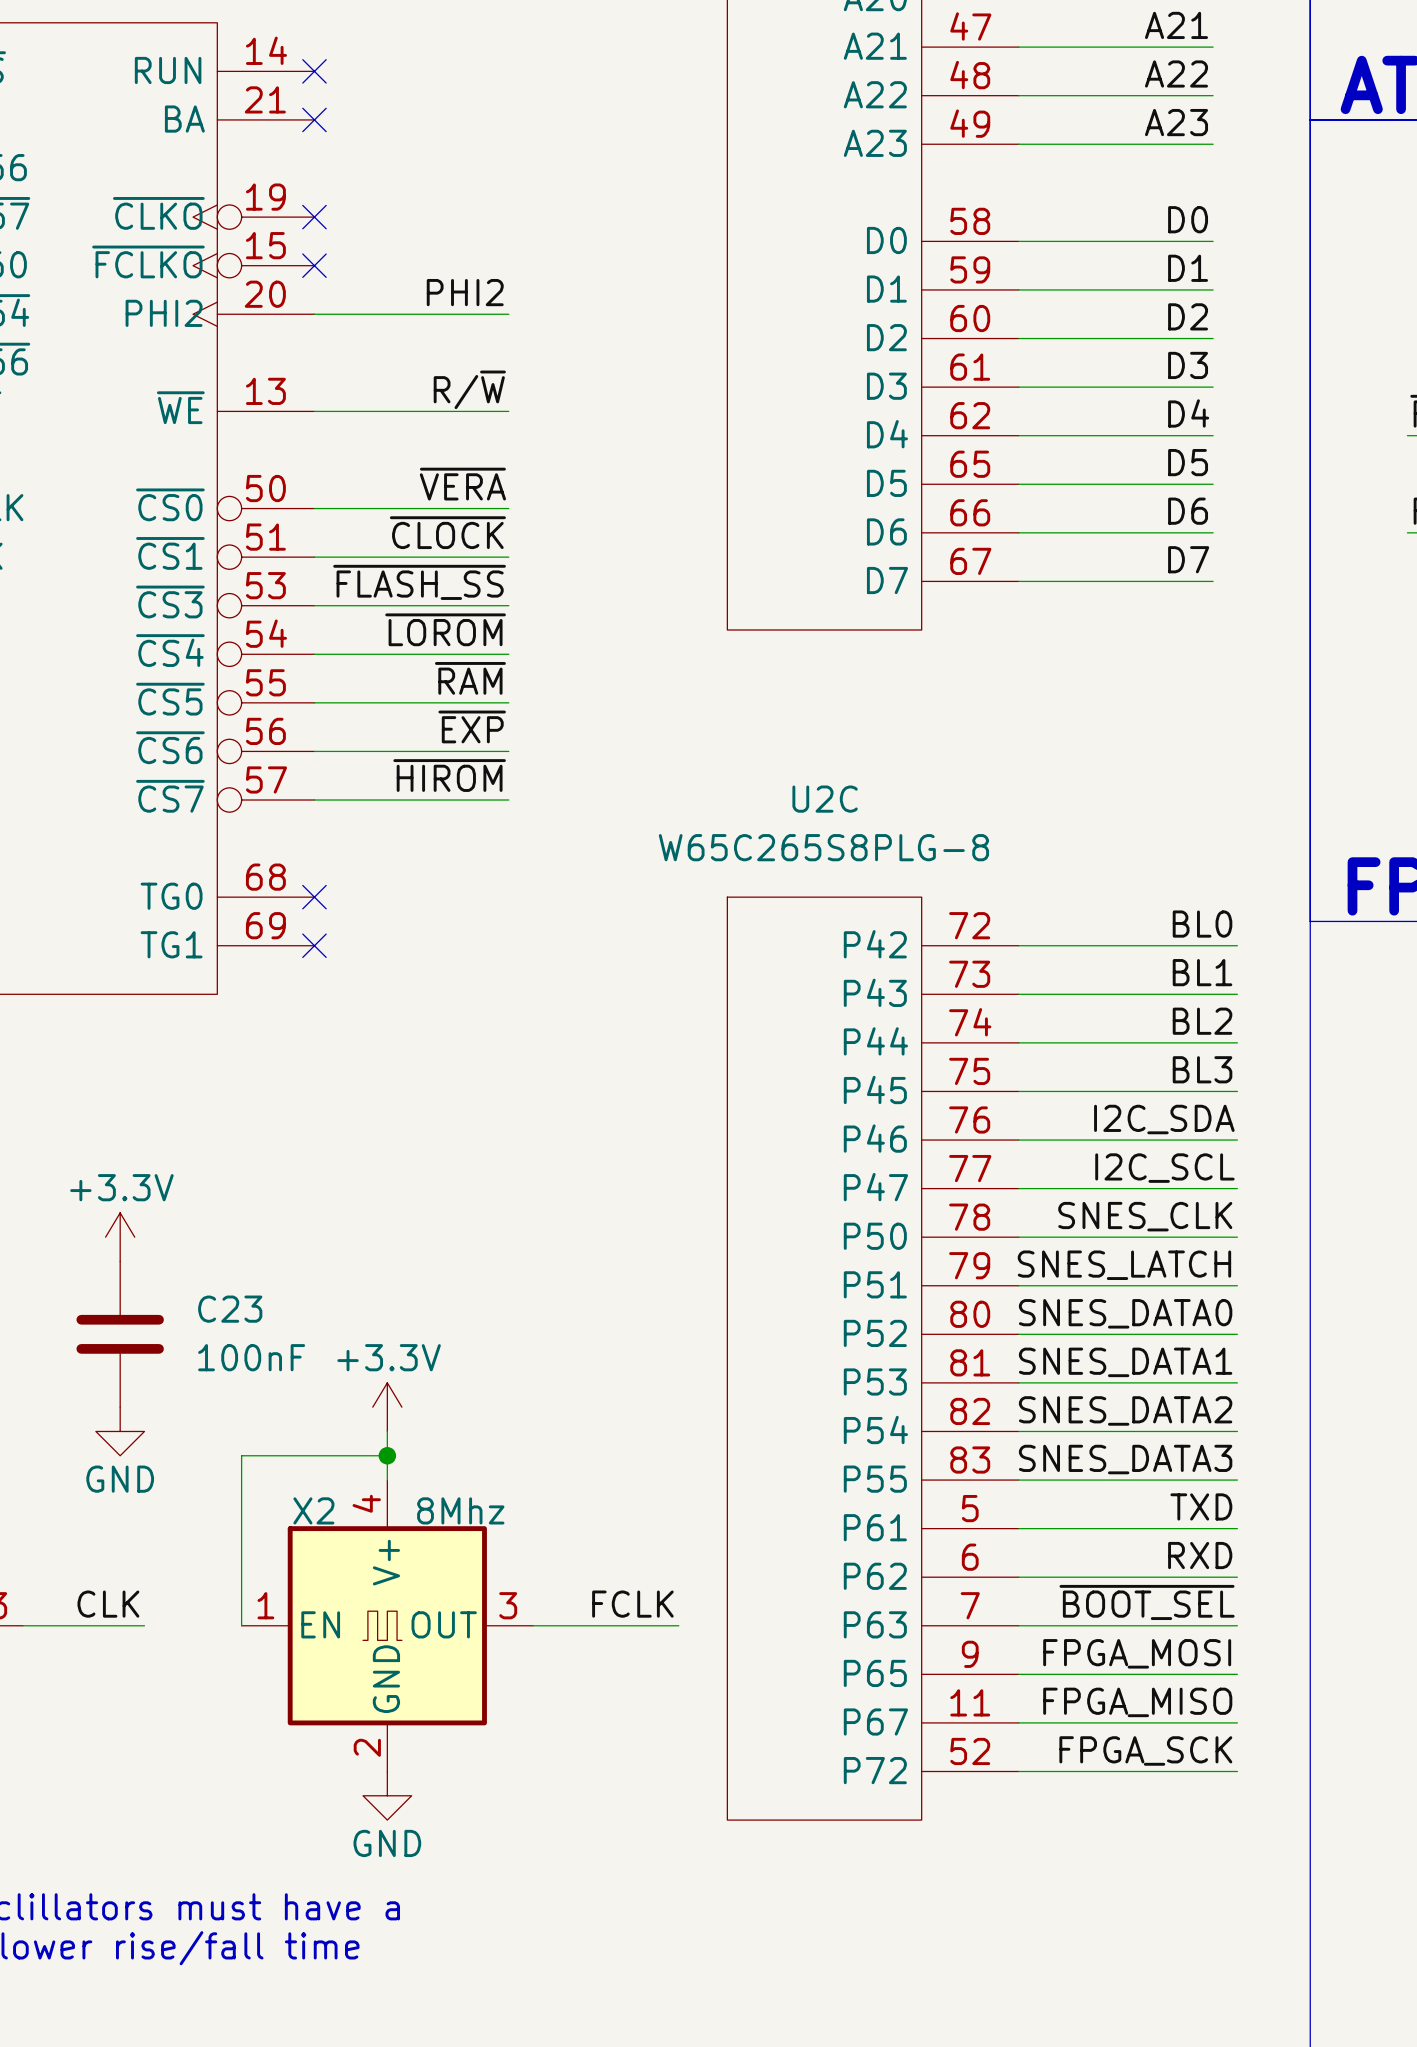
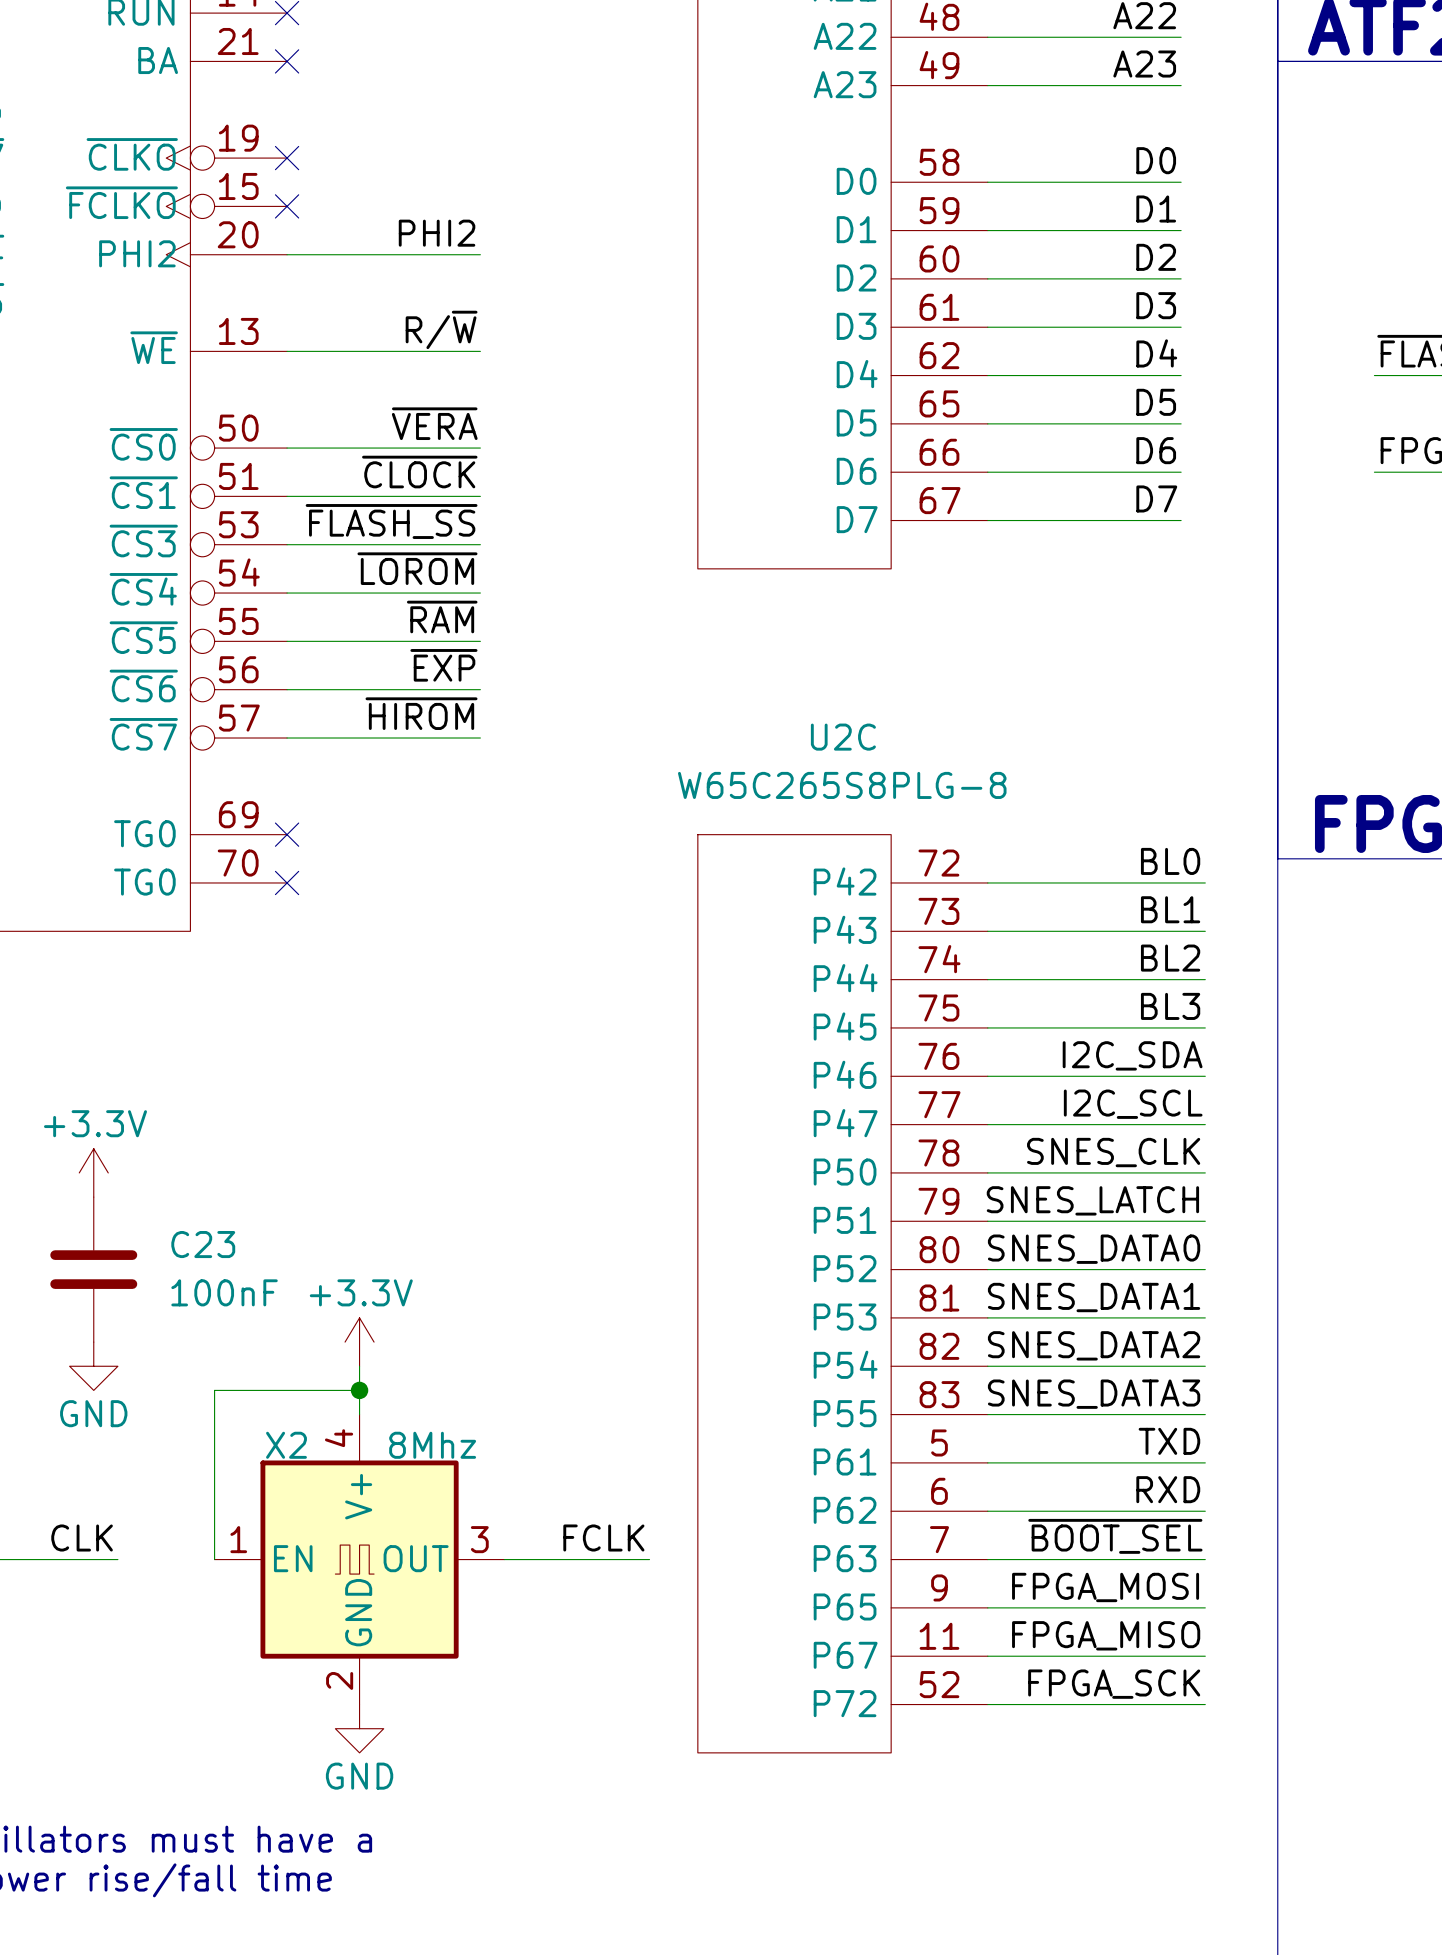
U2C name position: U2C (825, 799) -> U2C (843, 737)
U2C value position: W65C265S8PLG-8 (823, 847) -> W65C265S8PLG-8 (842, 785)
part pin number: 68 (265, 877) -> 69 (238, 814)
part pin number: 69 (265, 925) -> 70 (238, 863)
part pin name: TG1 (171, 944) -> TG0 (144, 882)

